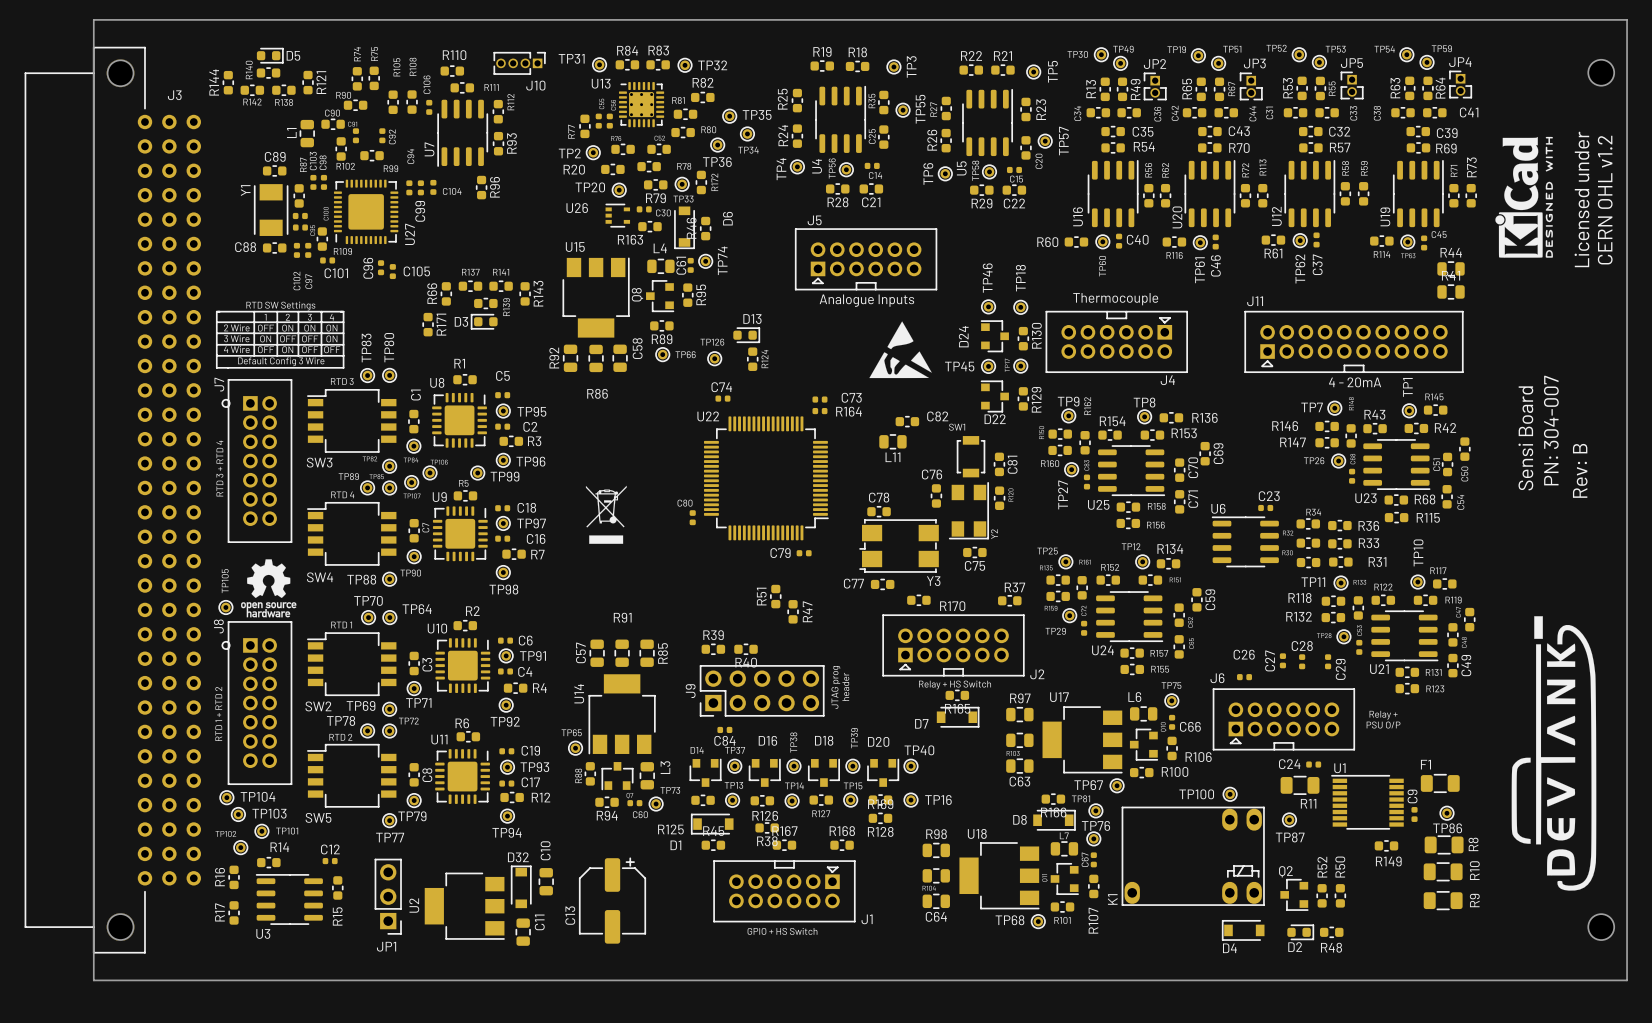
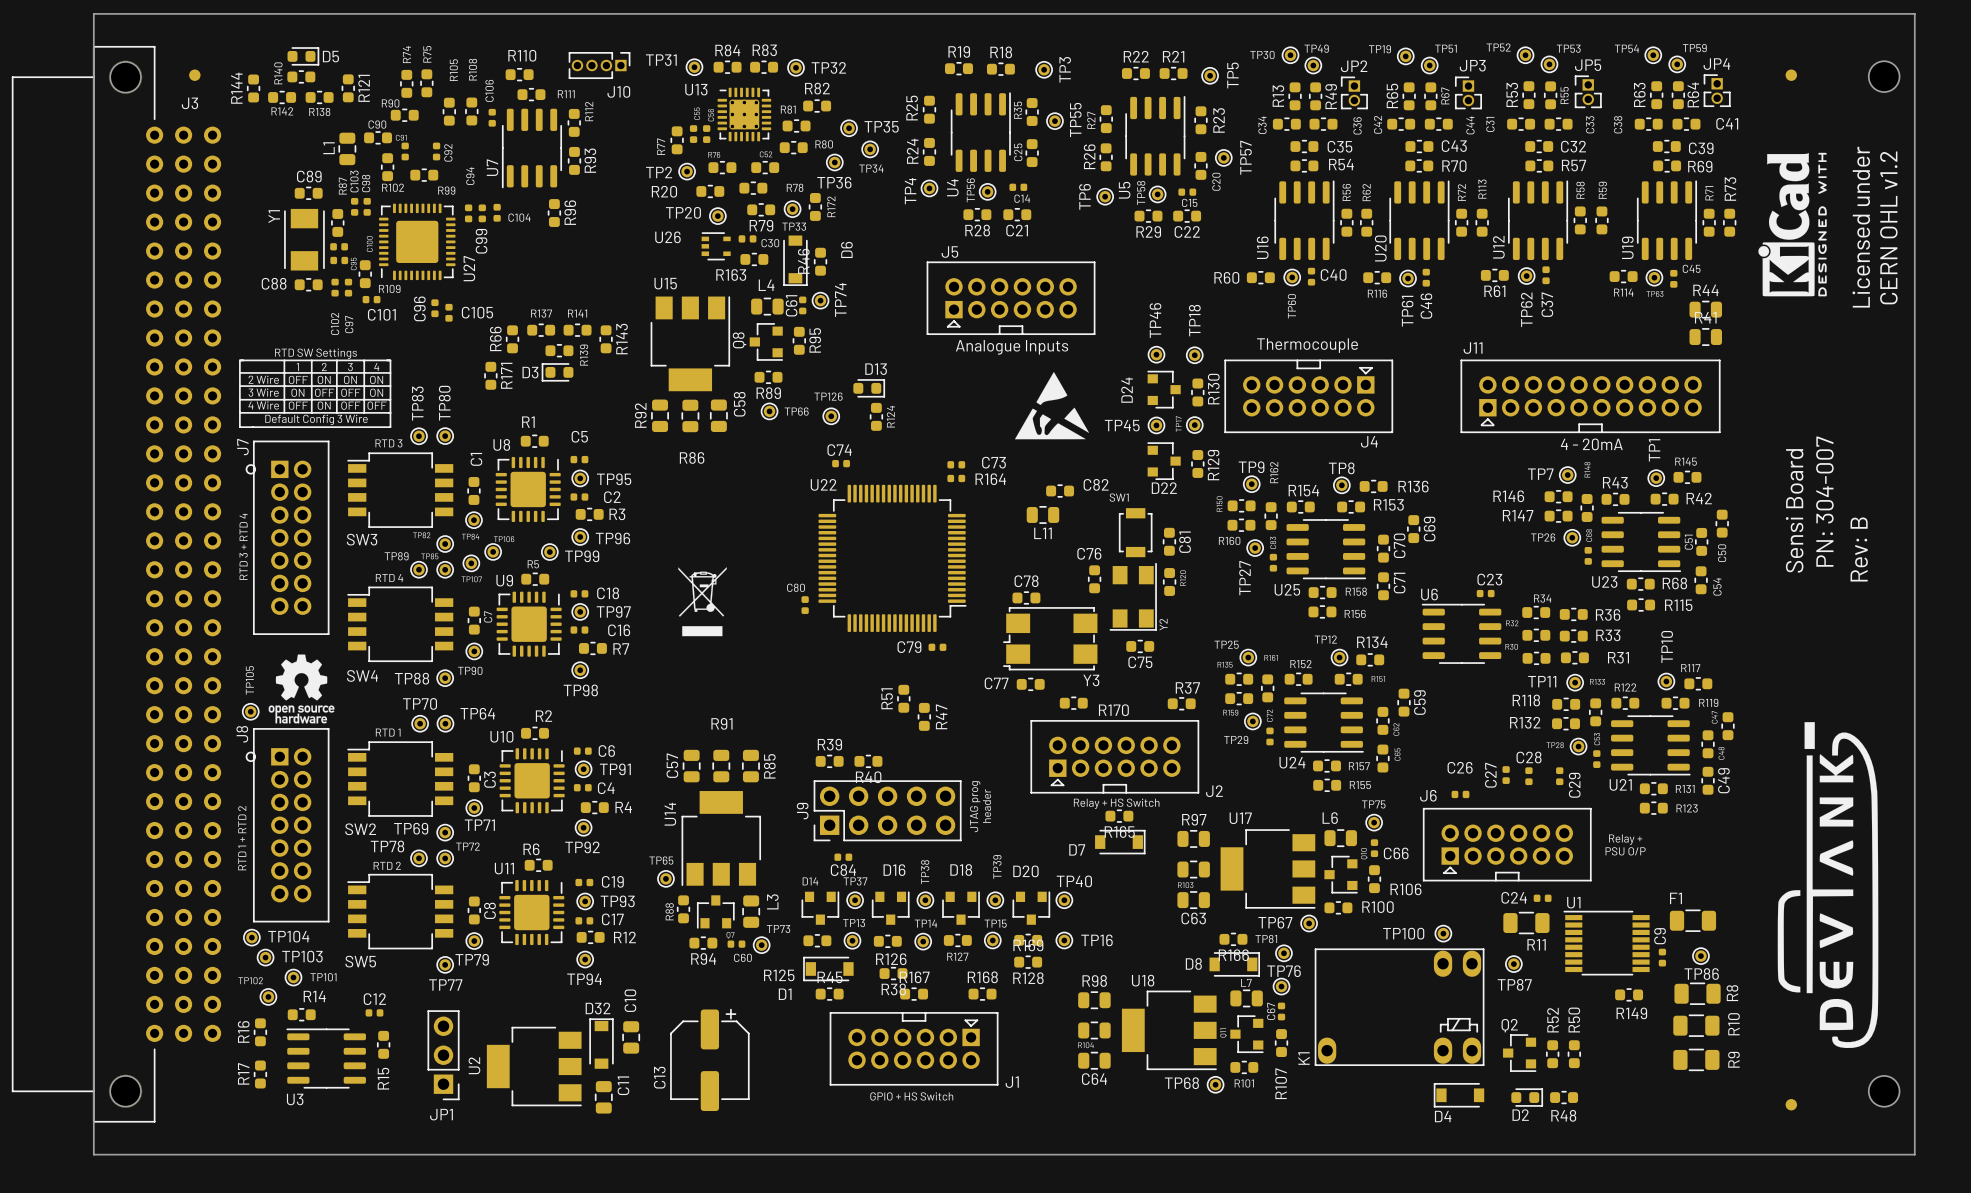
part: none -> (194, 75)
part: none -> (1791, 75)
part: none -> (1791, 1104)

